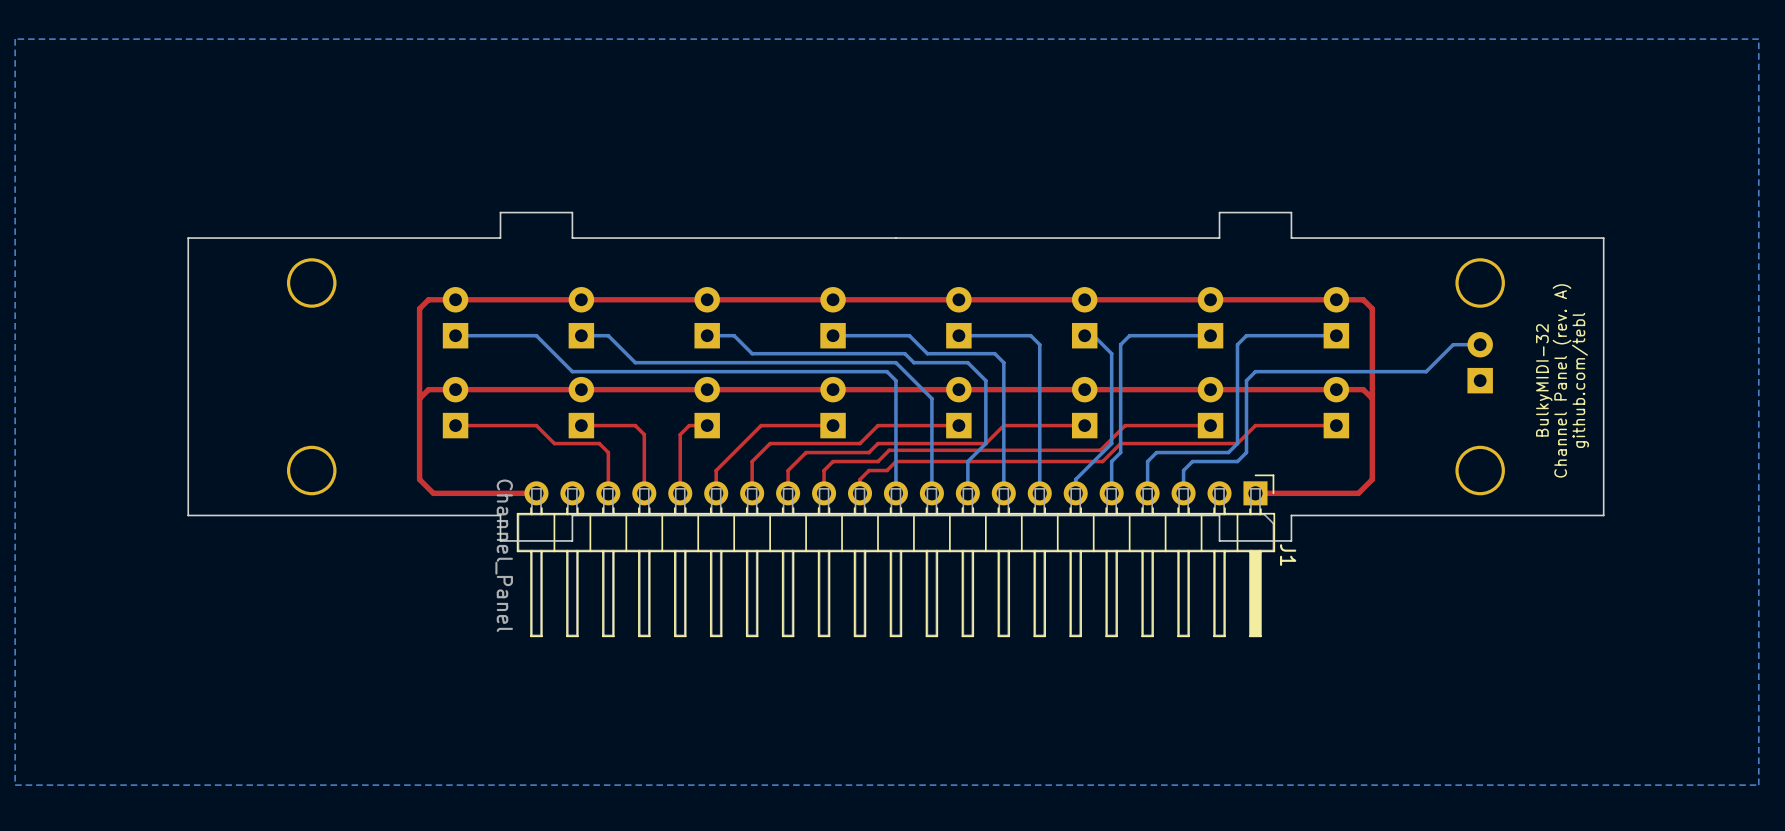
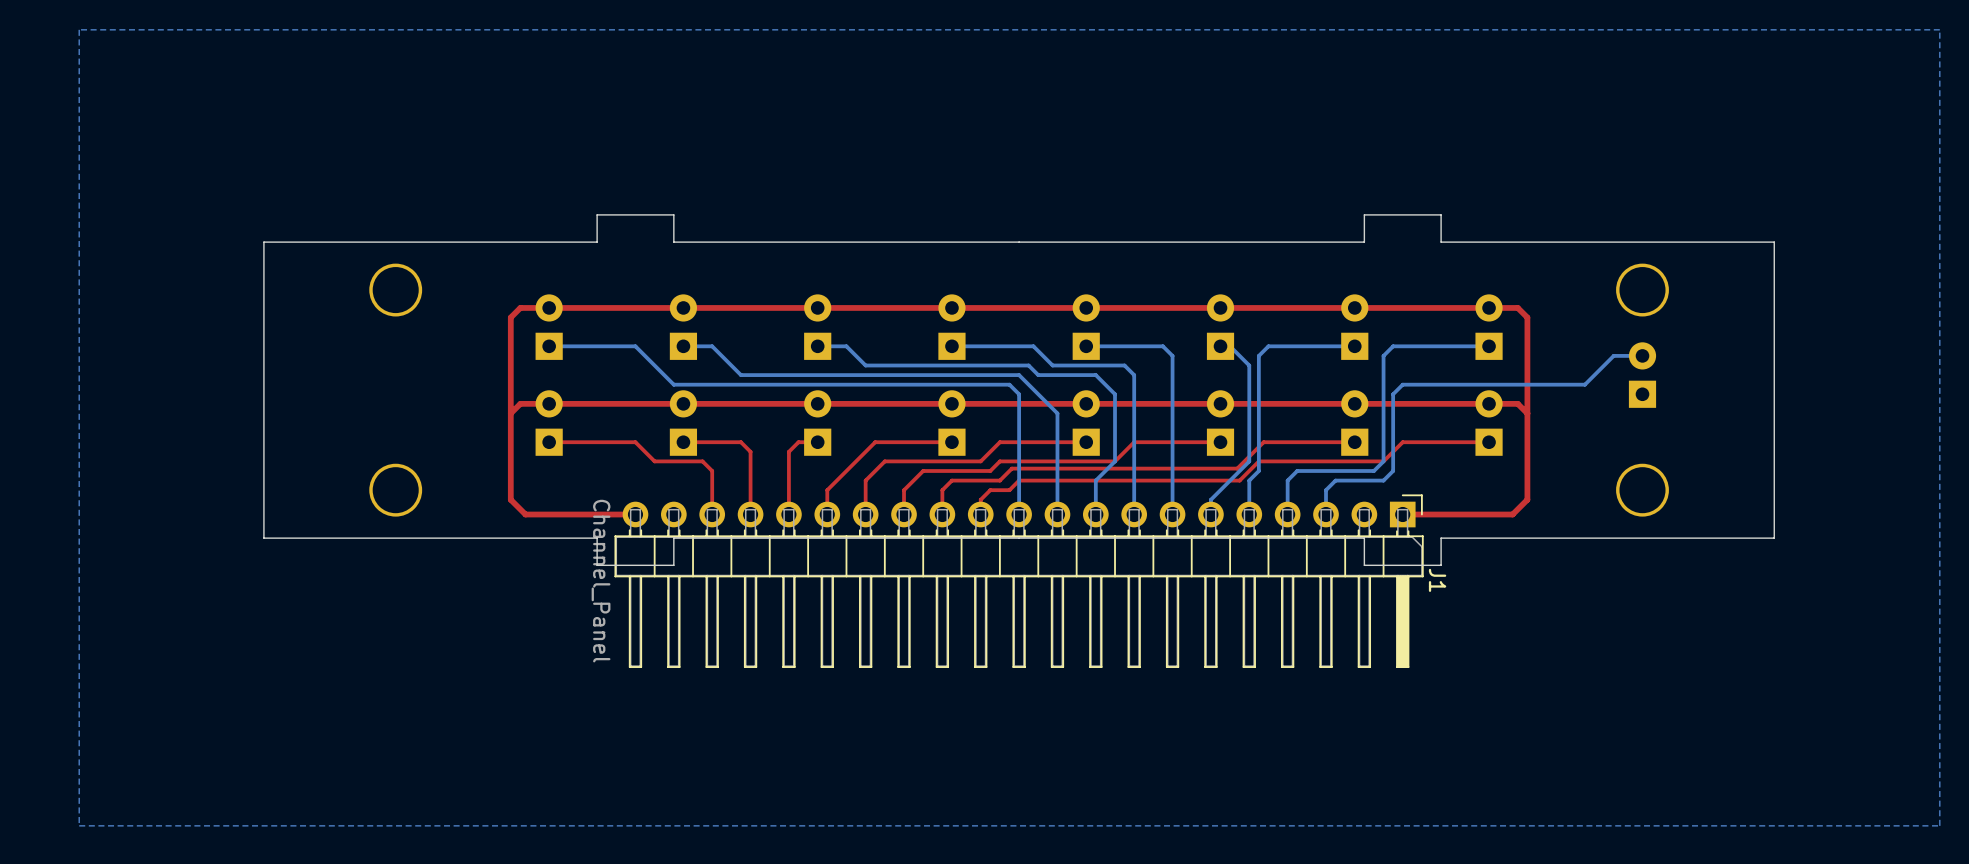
text: BulkyMIDI-32 (1544, 380) -> none
text: Channel Panel (rev. A) (1561, 380) -> none
text: github.com/tebl (1580, 380) -> none

